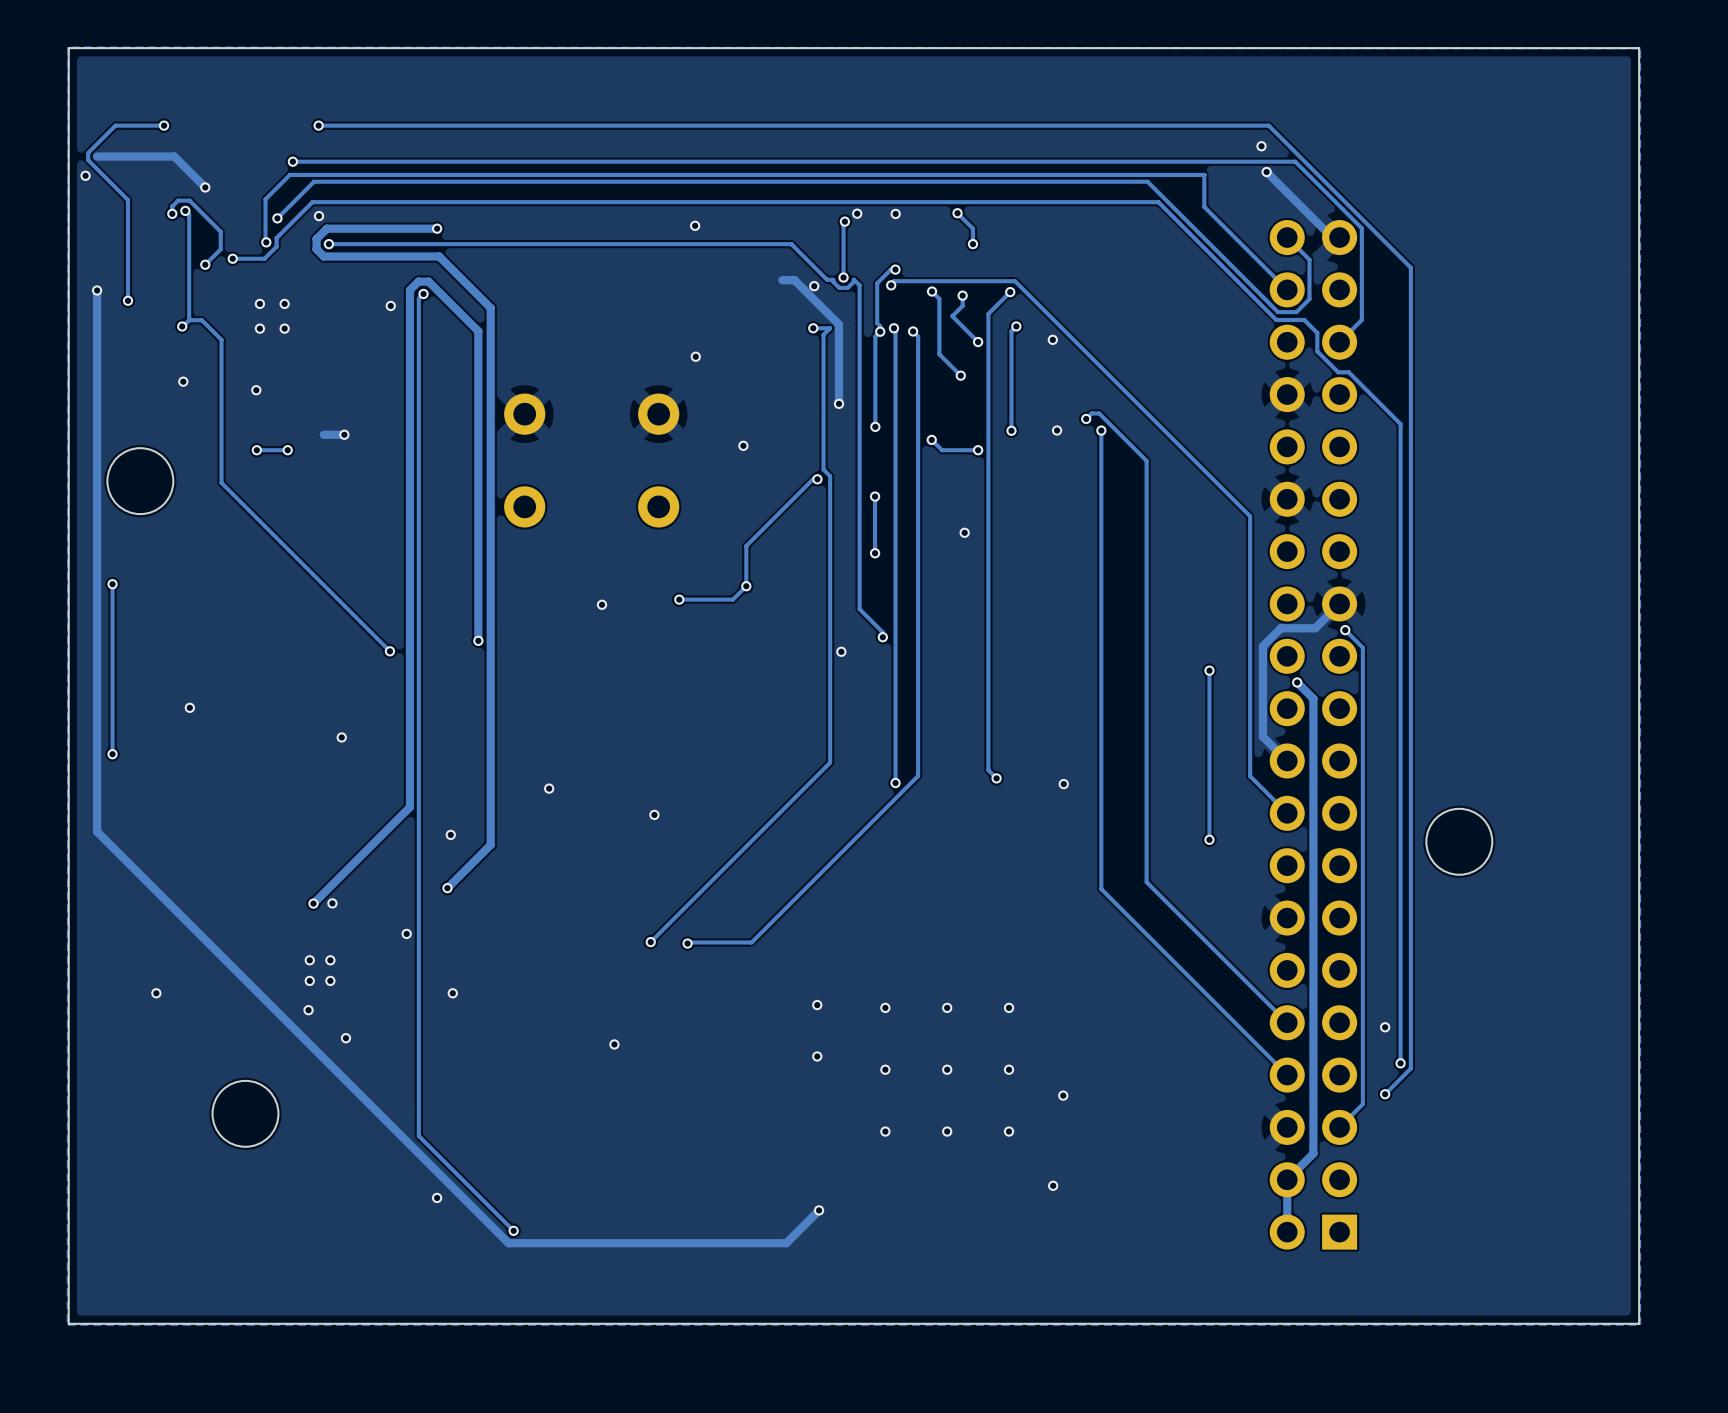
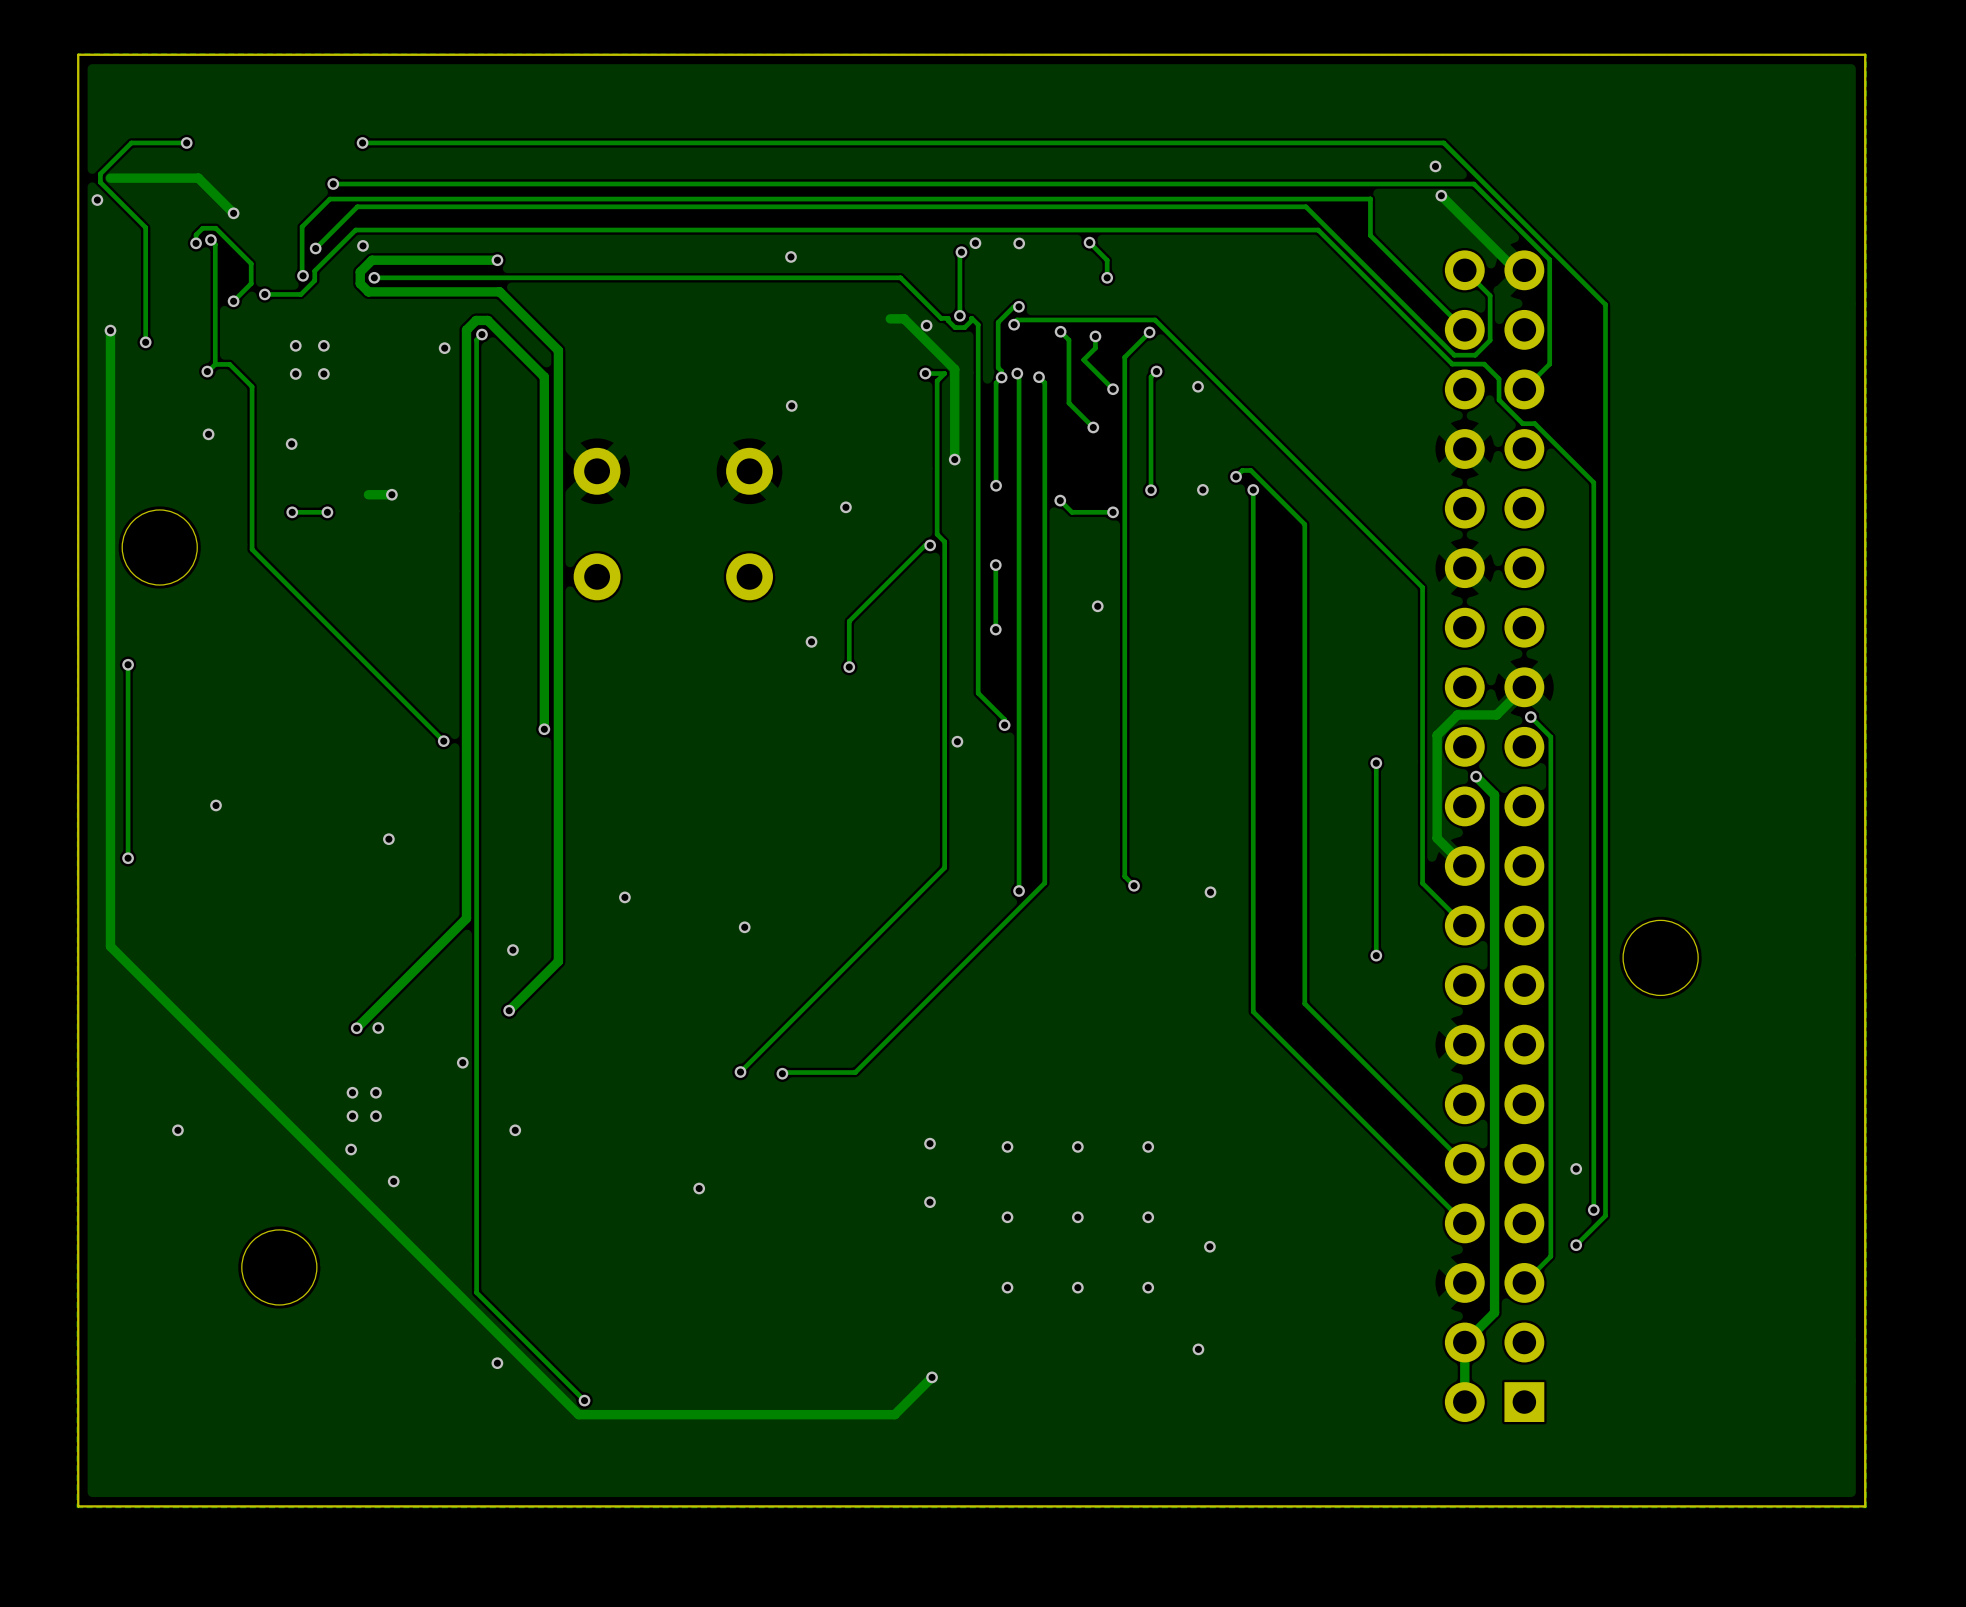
track: (746, 586) (732, 599) (679, 599) -> none
via position: (679, 599) -> (811, 641)
via: (602, 604) -> none

